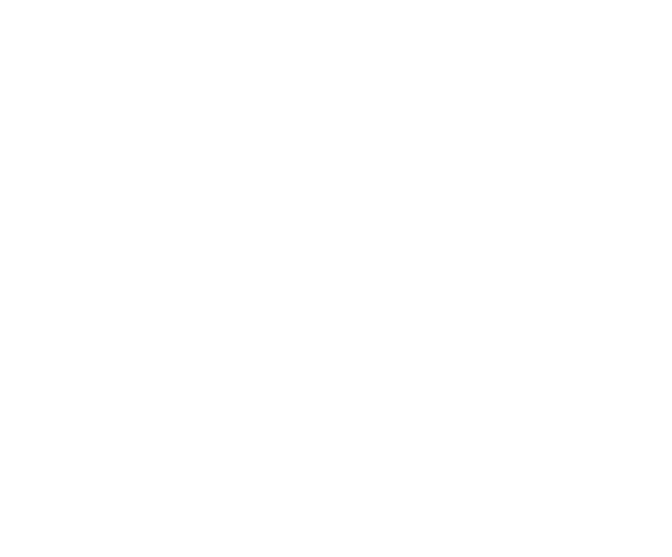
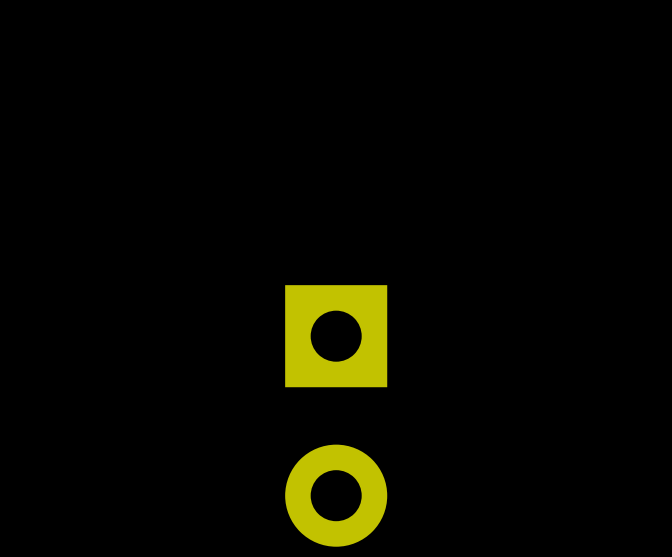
part: none -> (336, 415)

